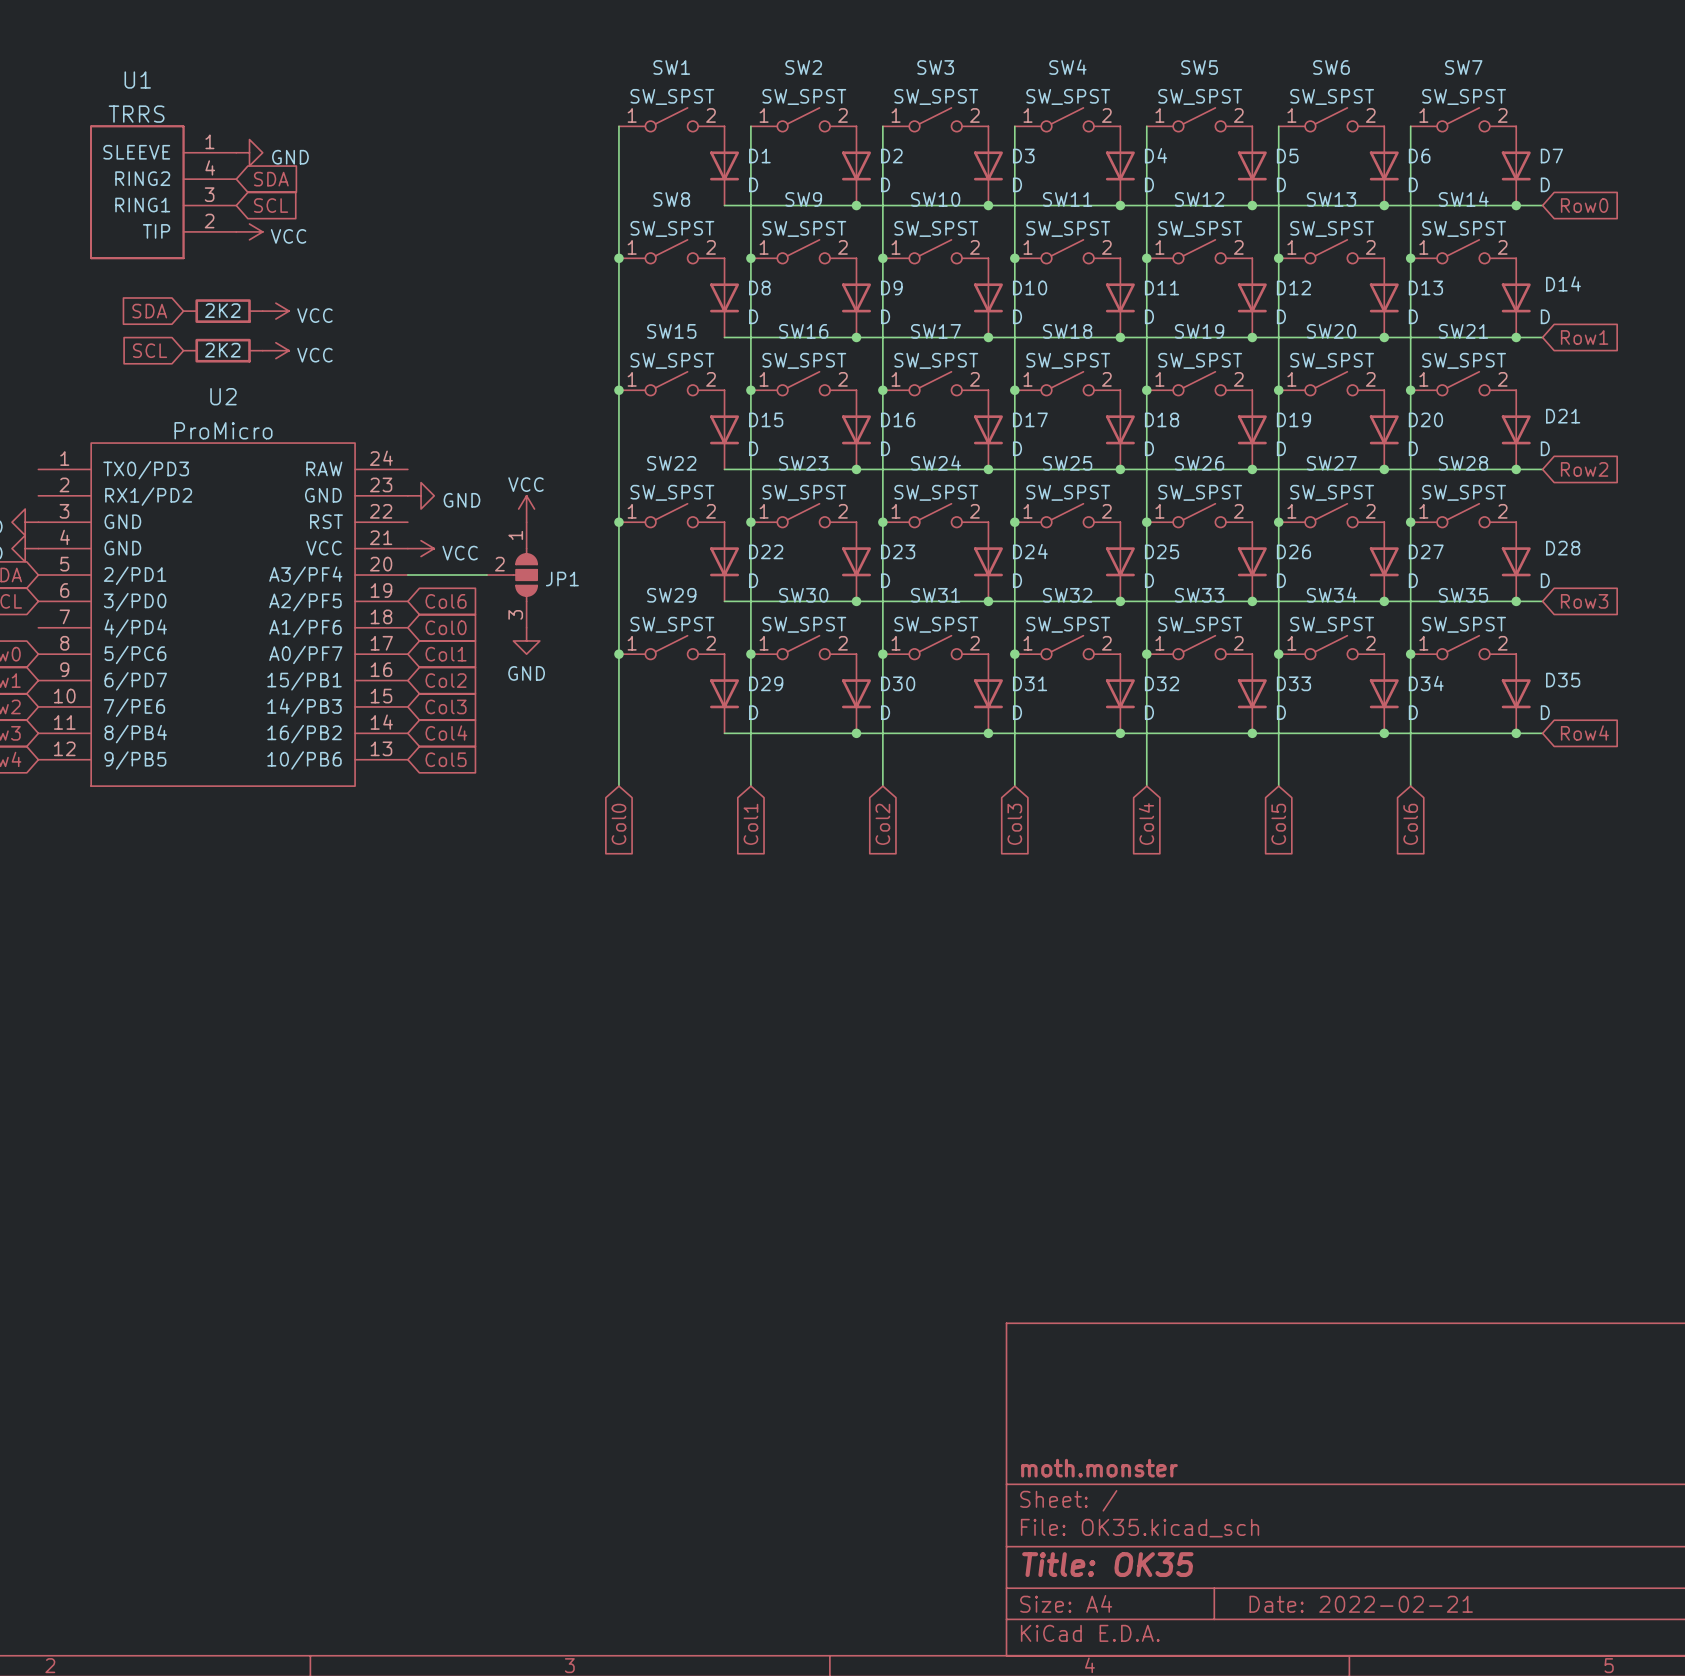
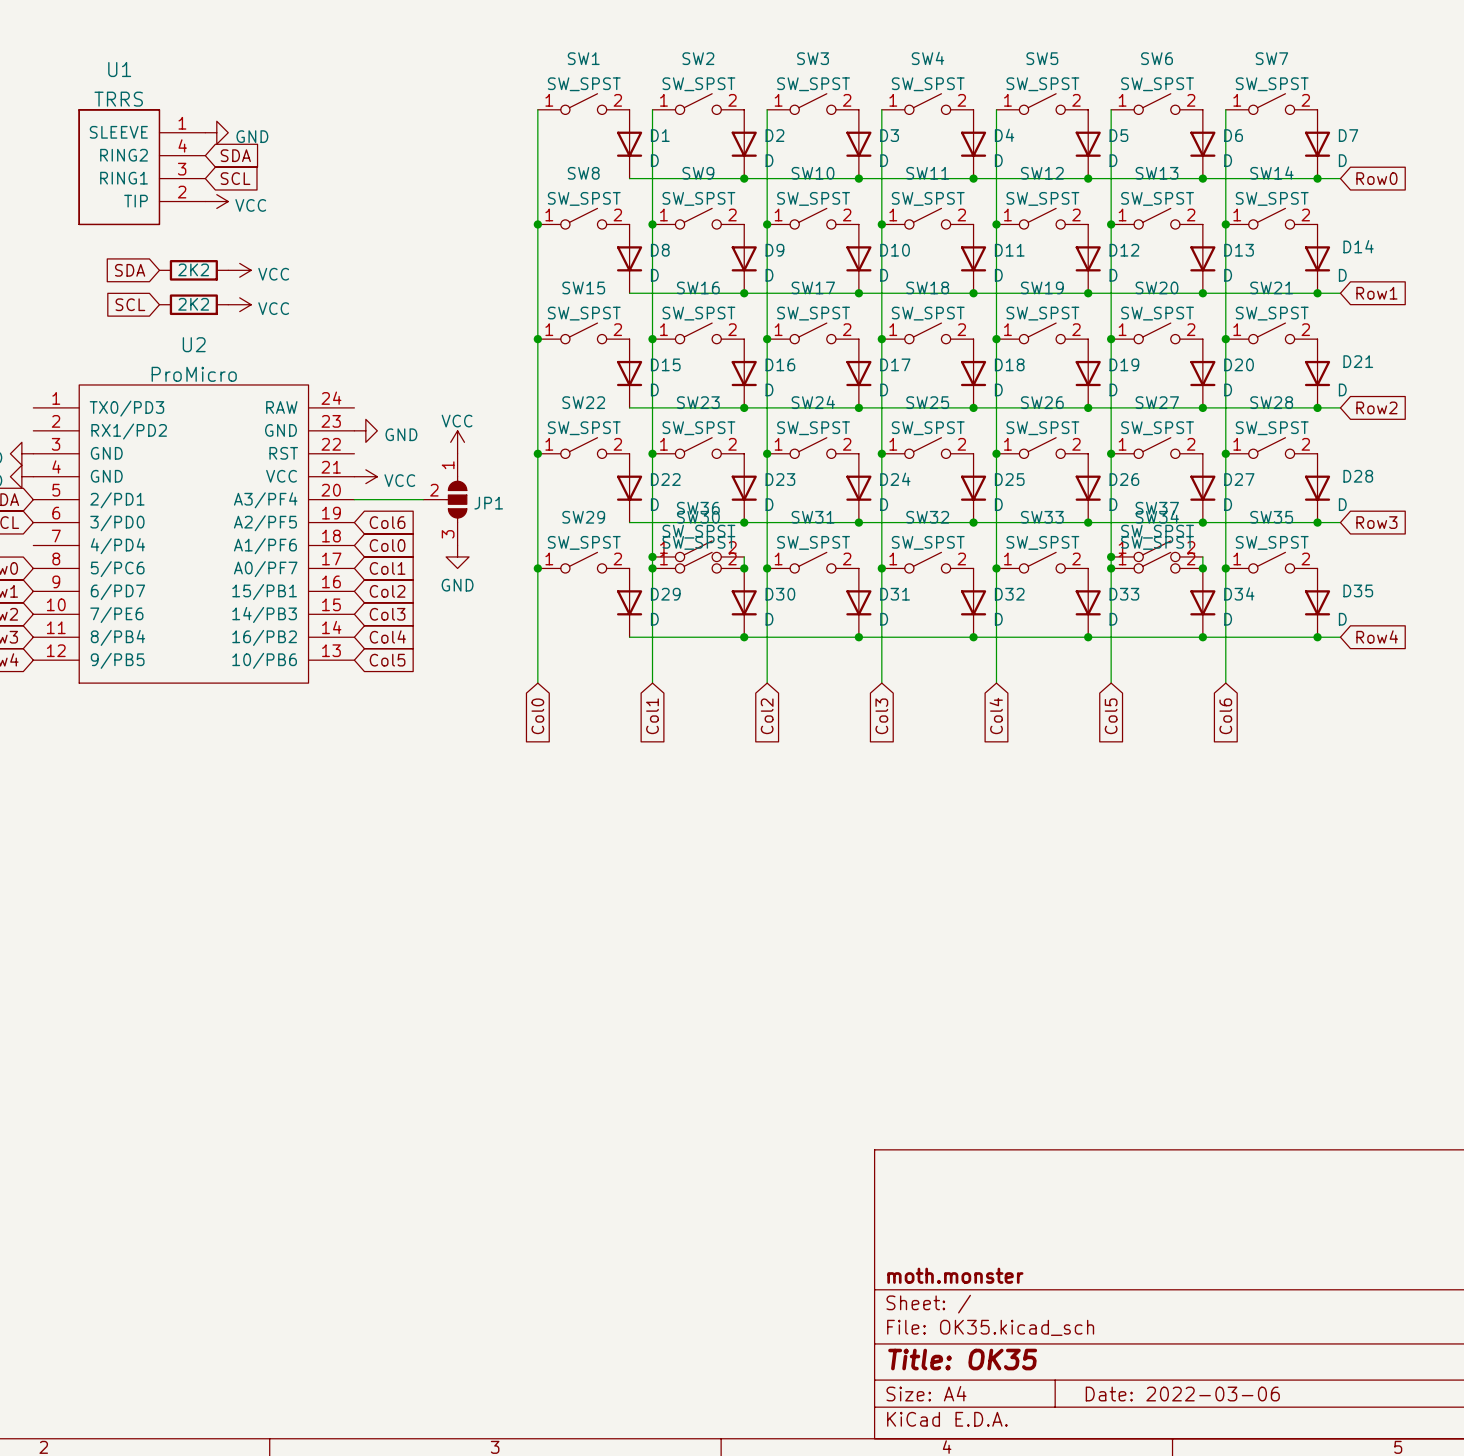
SW36: none -> SW_SPST (698, 551)
SW37: none -> SW_SPST (1157, 551)
junction: none -> (652, 556)
wire: none -> (744, 556) (744, 568)
junction: none -> (1111, 556)
wire: none -> (1202, 556) (1202, 568)
junction: none -> (744, 568)
junction: none -> (1202, 568)
title block: Date: 2022-02-21 (1361, 1604) -> Date: 2022-03-06 (1182, 1394)

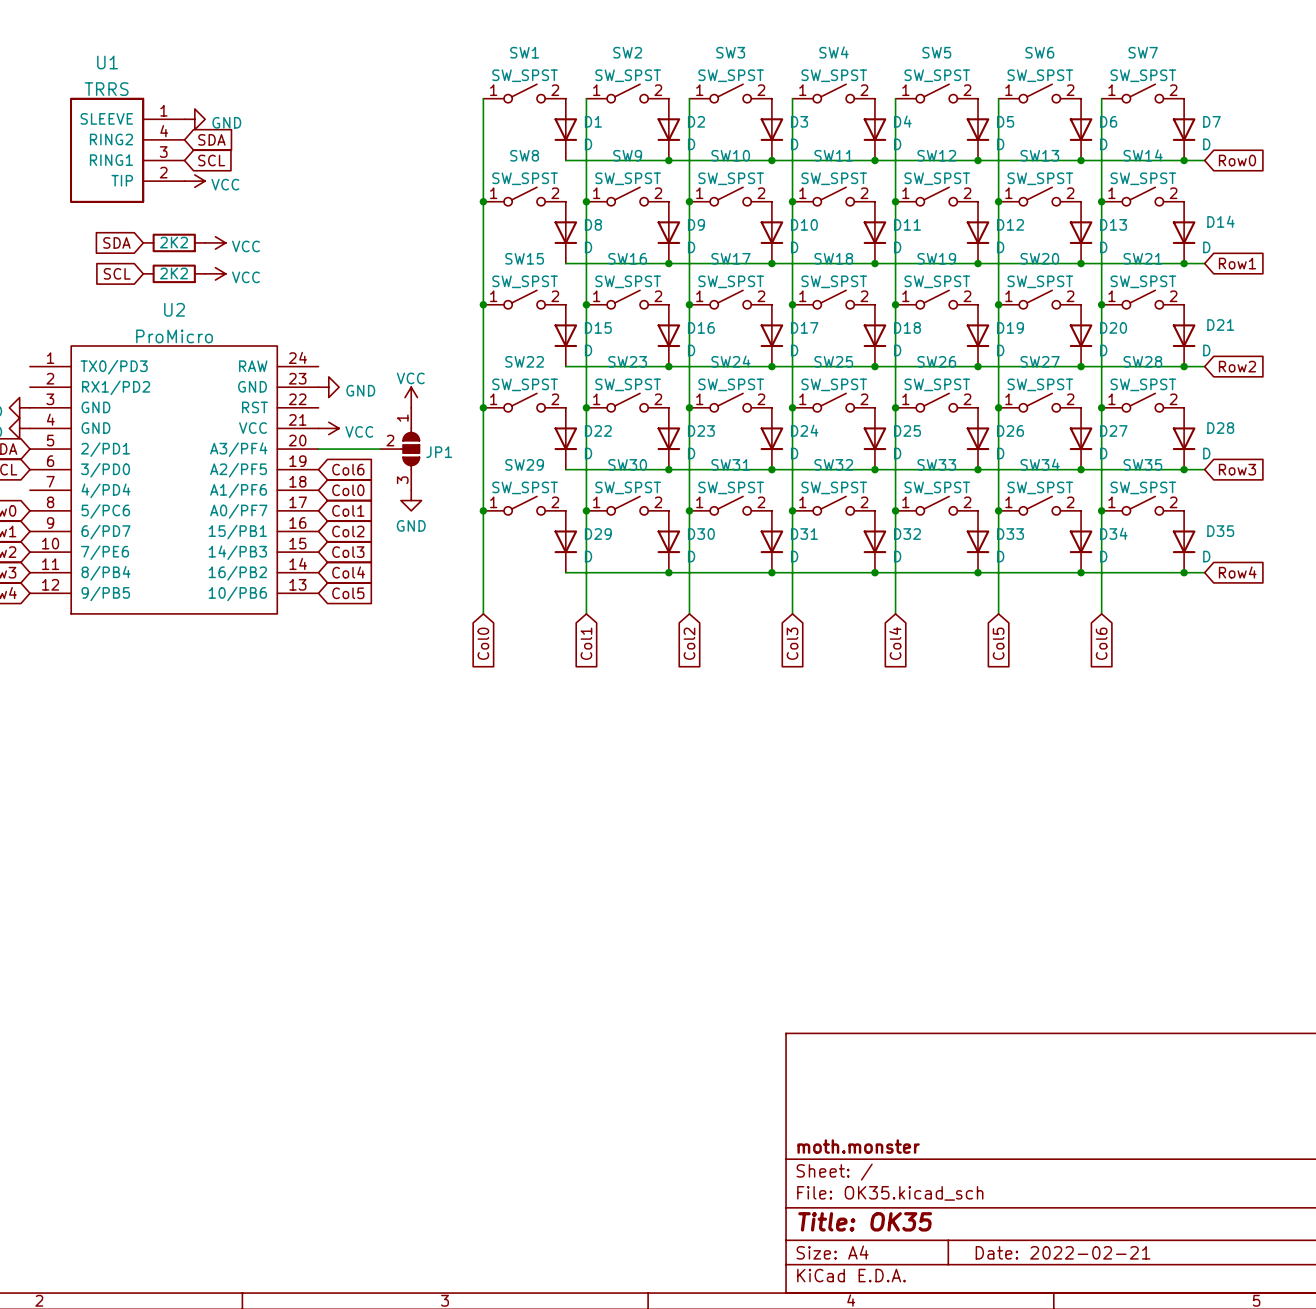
SW36: SW_SPST (698, 551) -> none
SW37: SW_SPST (1157, 551) -> none
junction: (652, 556) -> none
wire: (744, 556) (744, 568) -> none
junction: (1111, 556) -> none
wire: (1202, 556) (1202, 568) -> none
junction: (744, 568) -> none
junction: (1202, 568) -> none
title block: Date: 2022-03-06 (1182, 1394) -> Date: 2022-02-21 (1063, 1252)

